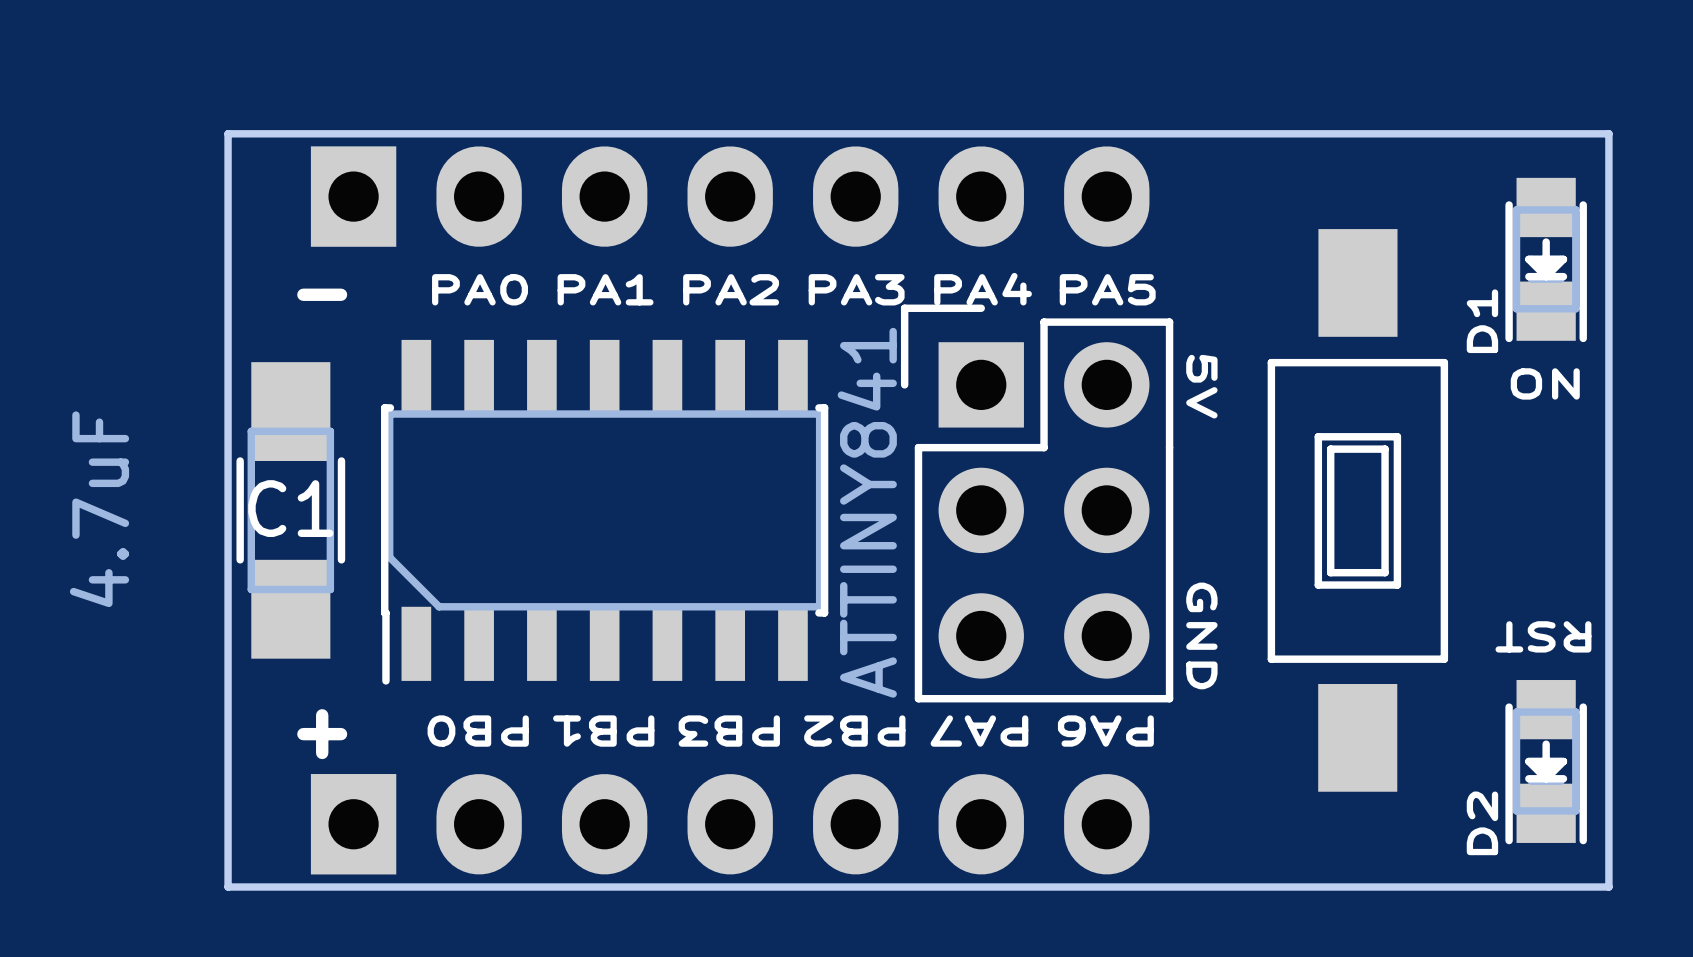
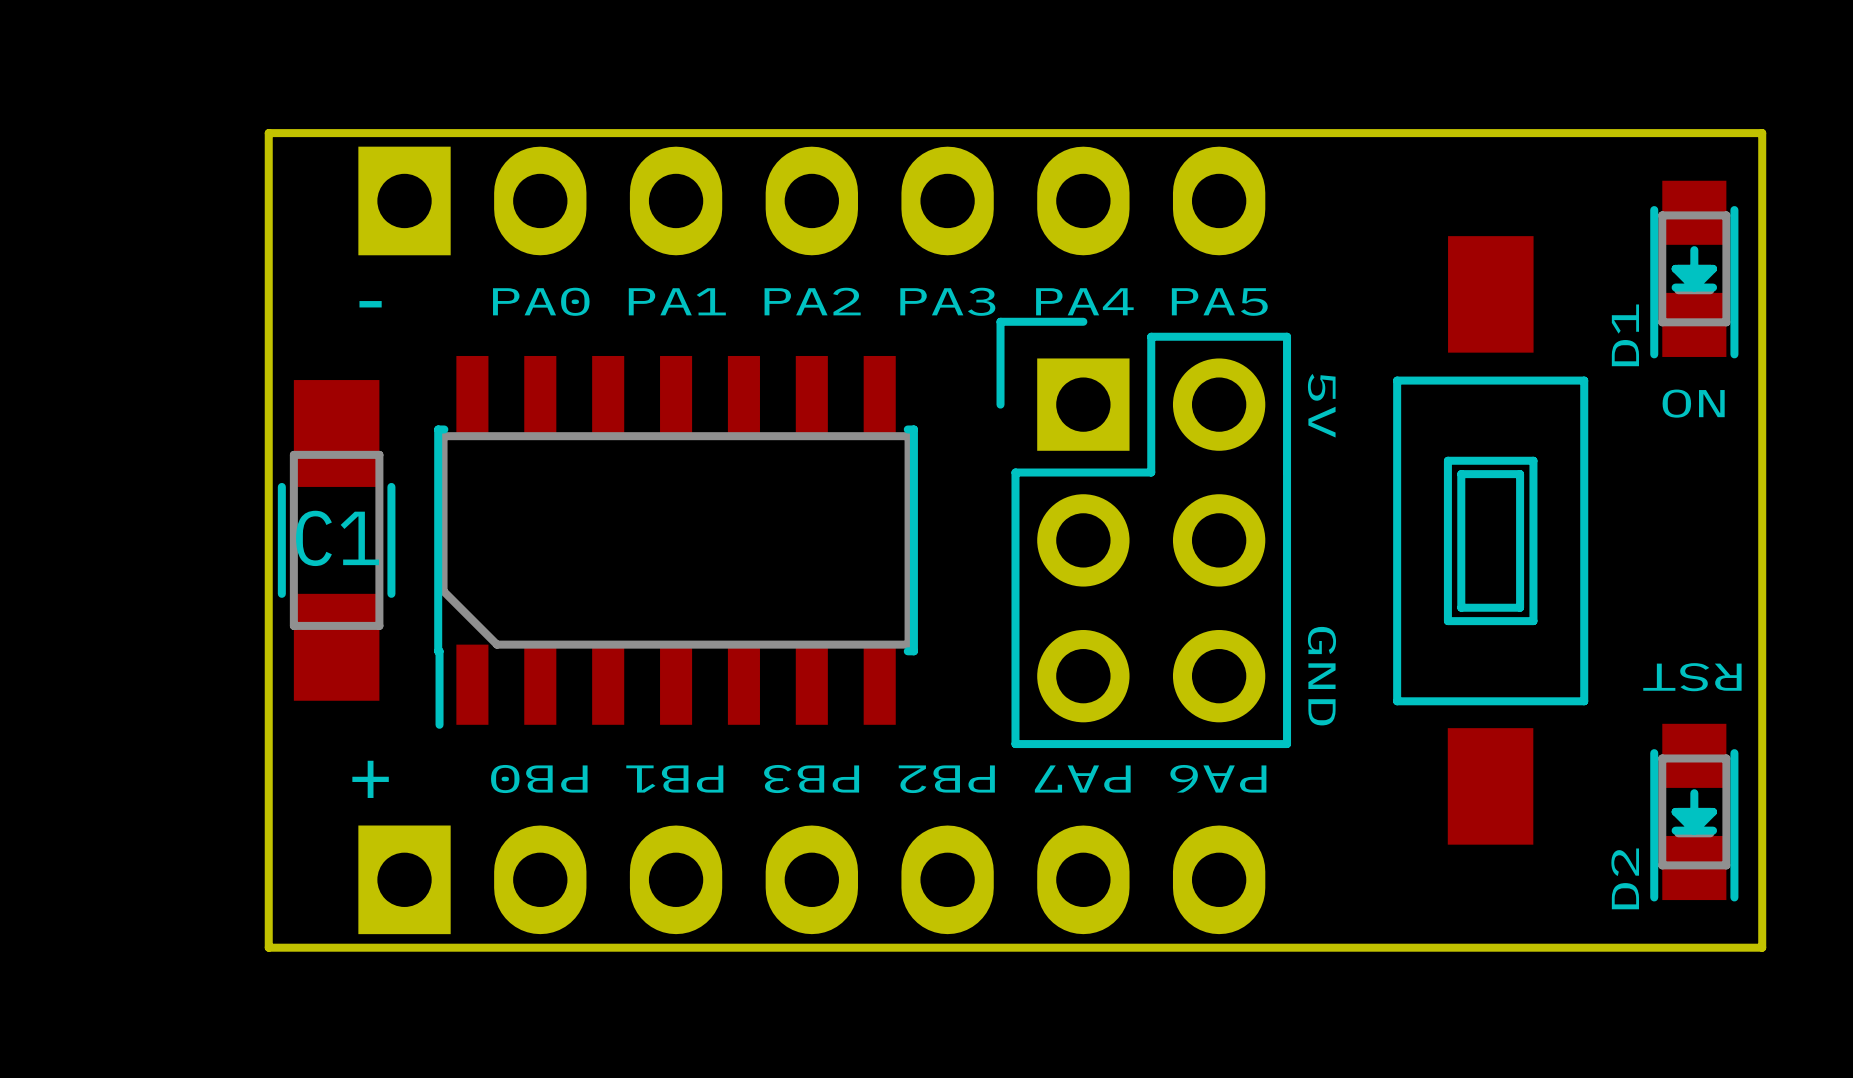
C1 value: 4.7uF (99, 509) -> none
part value: ATTINY841 (867, 512) -> none

